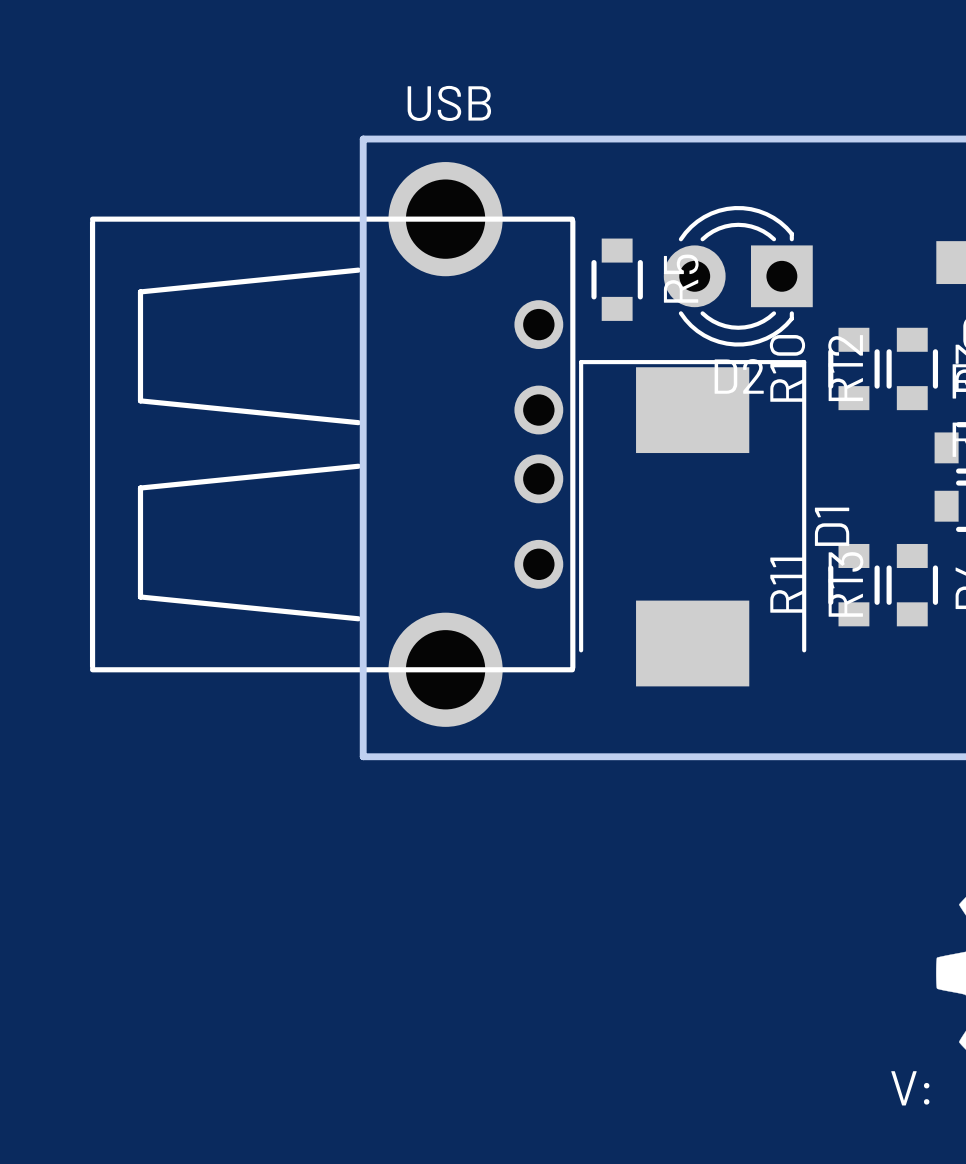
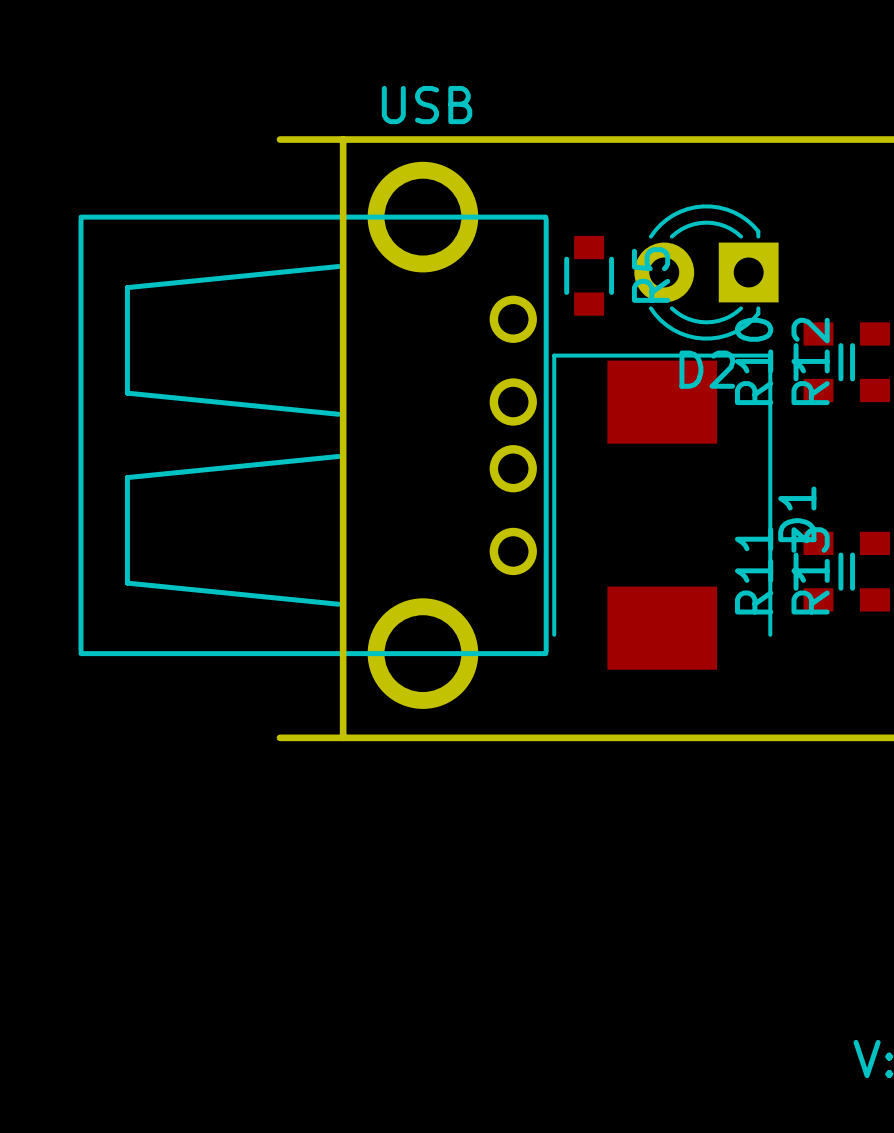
board edge: none -> (280, 139) (343, 139)
board edge: none -> (280, 737) (343, 737)

